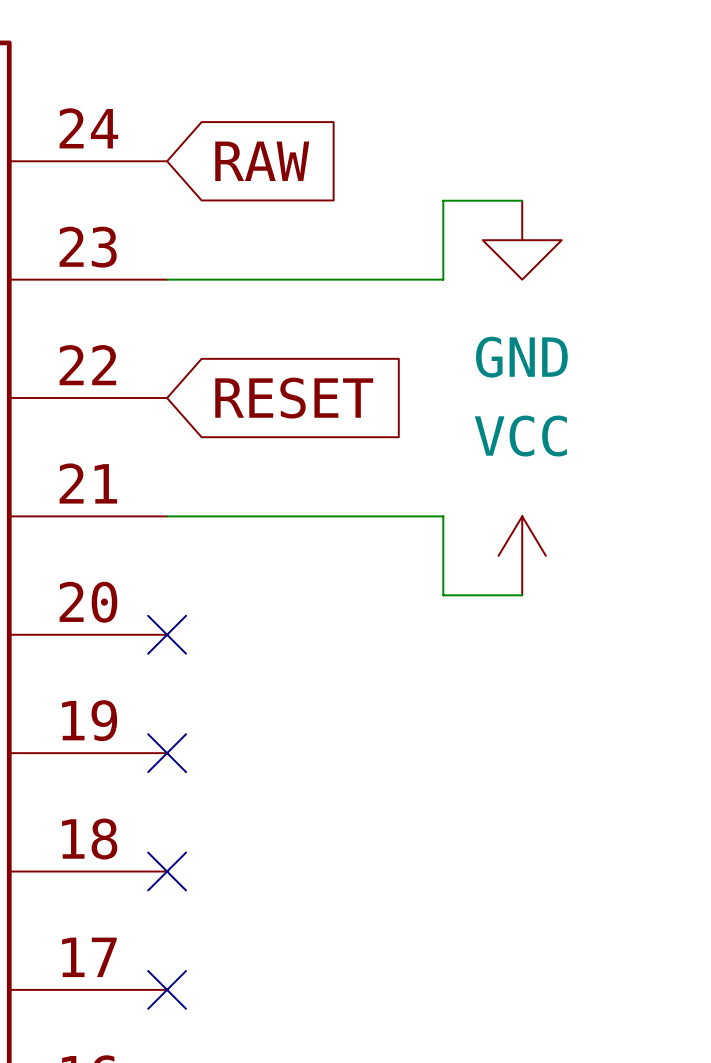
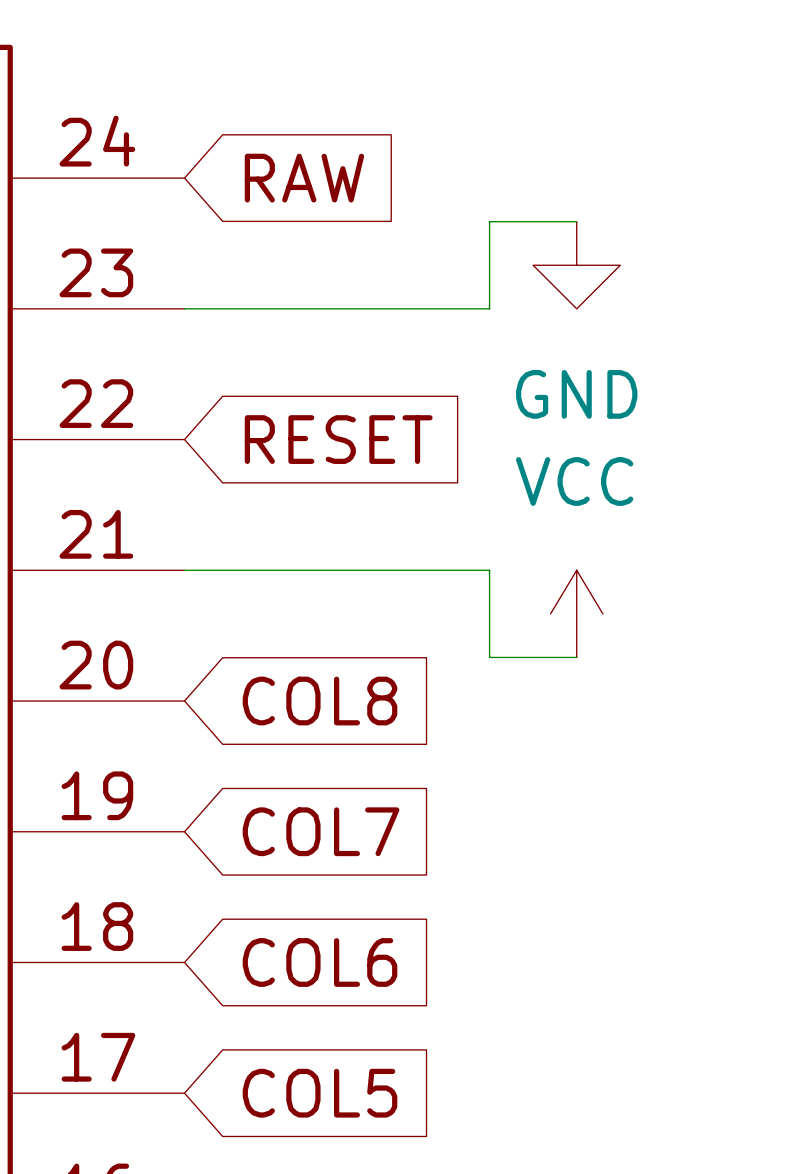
no-connect mark: (167, 634) -> none
global label: none -> COL8 (320, 701)
no-connect mark: (167, 753) -> none
global label: none -> COL7 (321, 831)
no-connect mark: (167, 871) -> none
global label: none -> COL6 (320, 962)
no-connect mark: (167, 989) -> none
global label: none -> COL5 (320, 1093)

